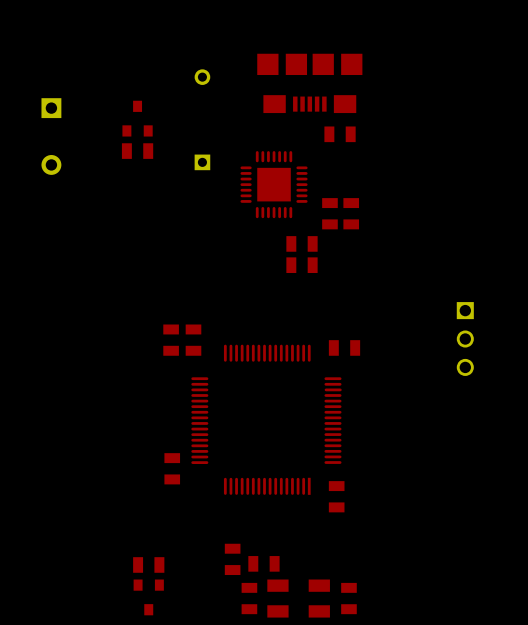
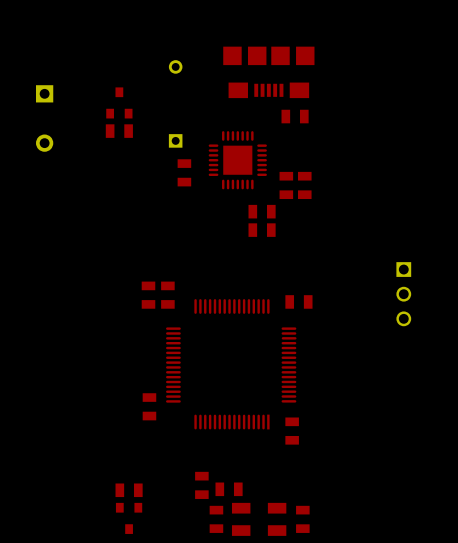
part: none -> (184, 172)

